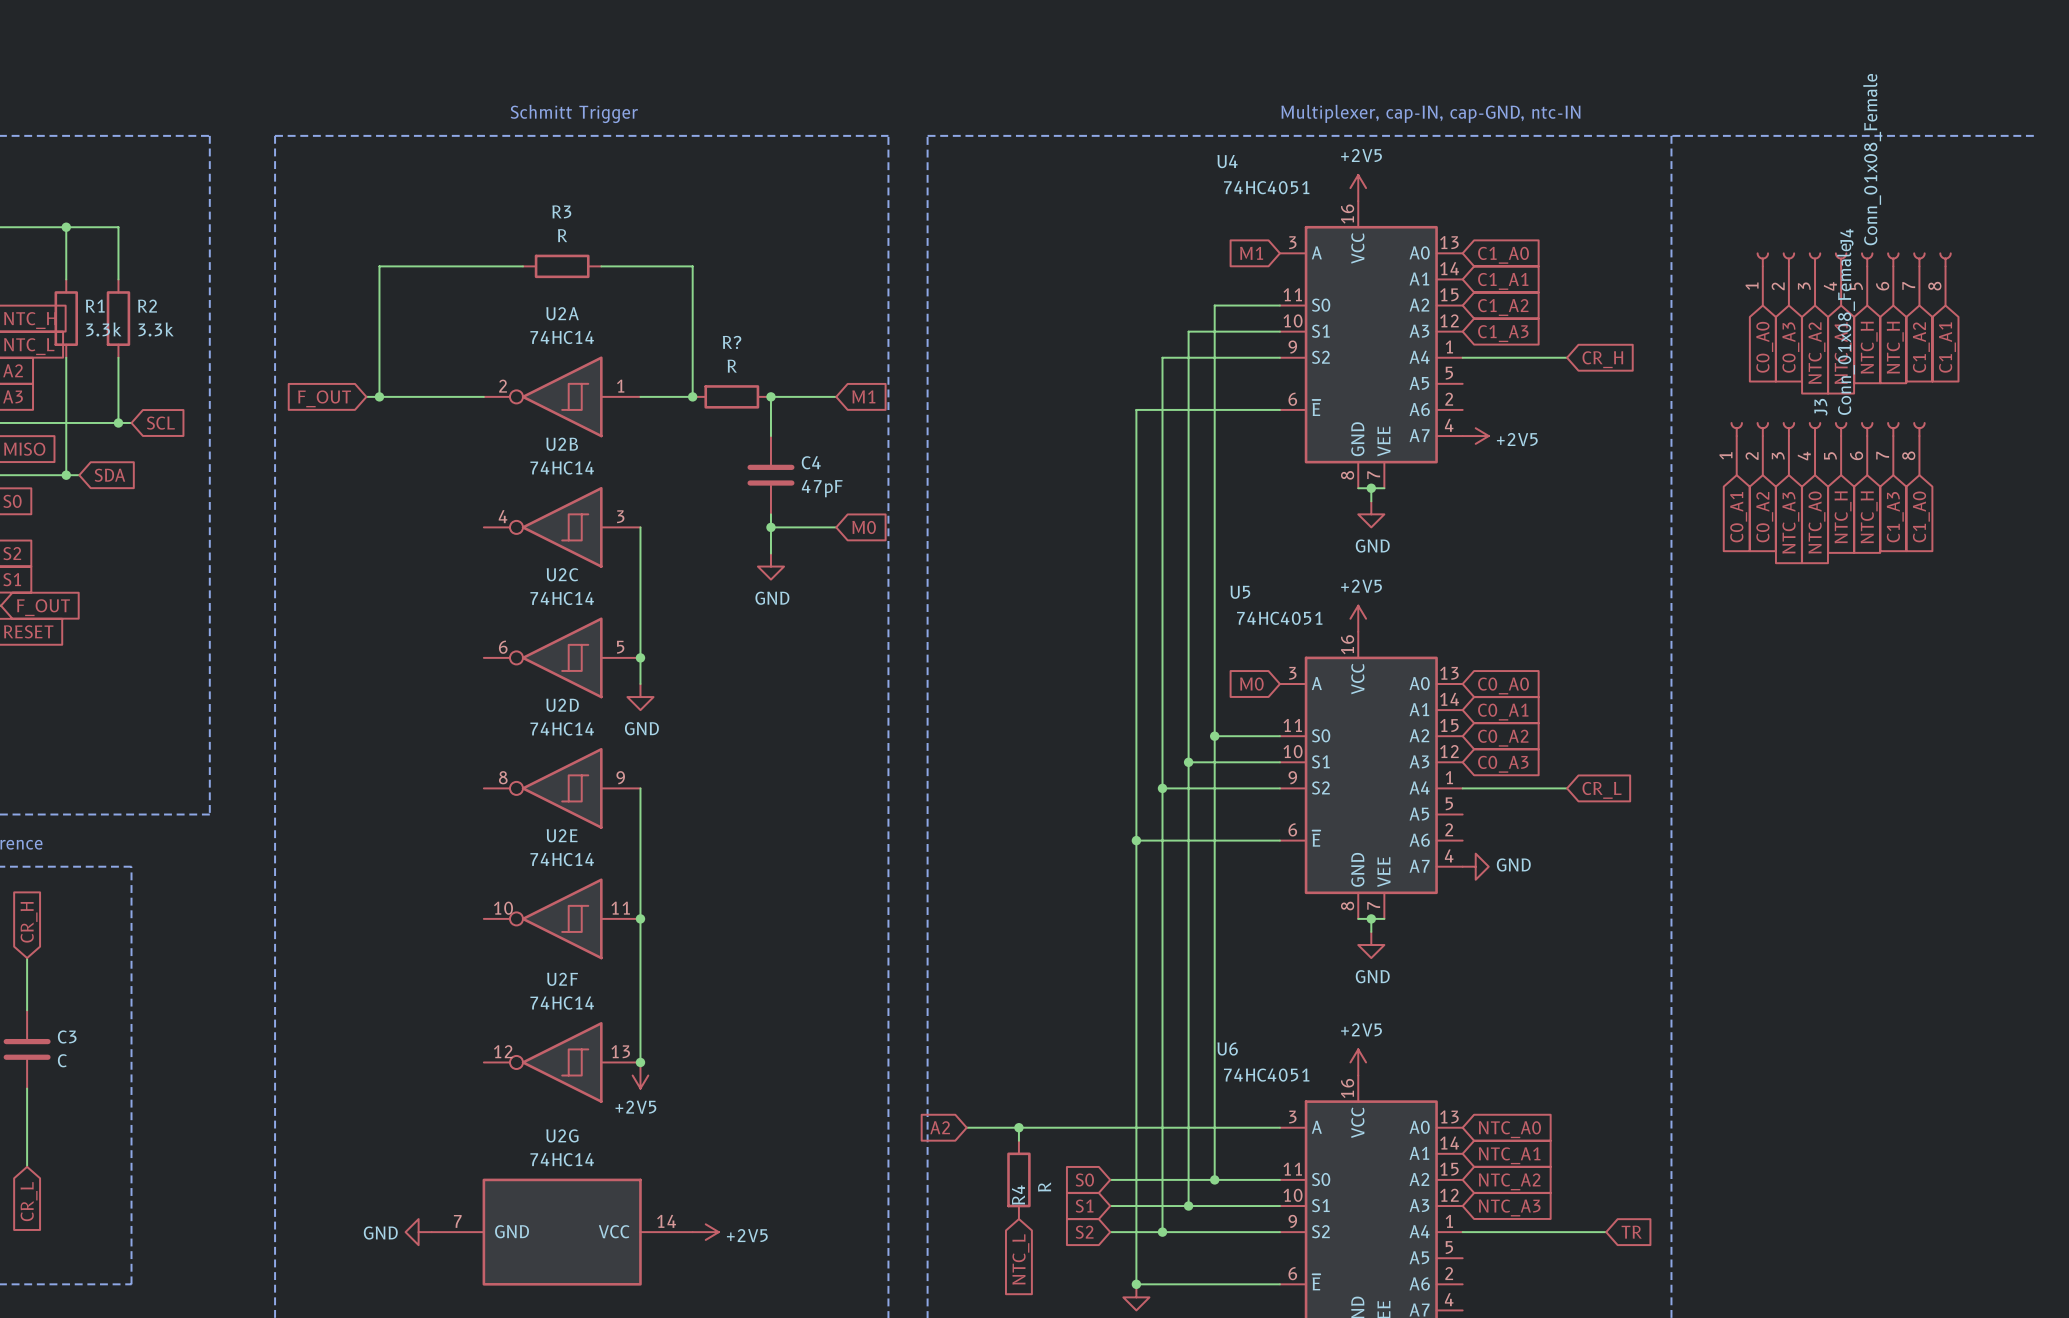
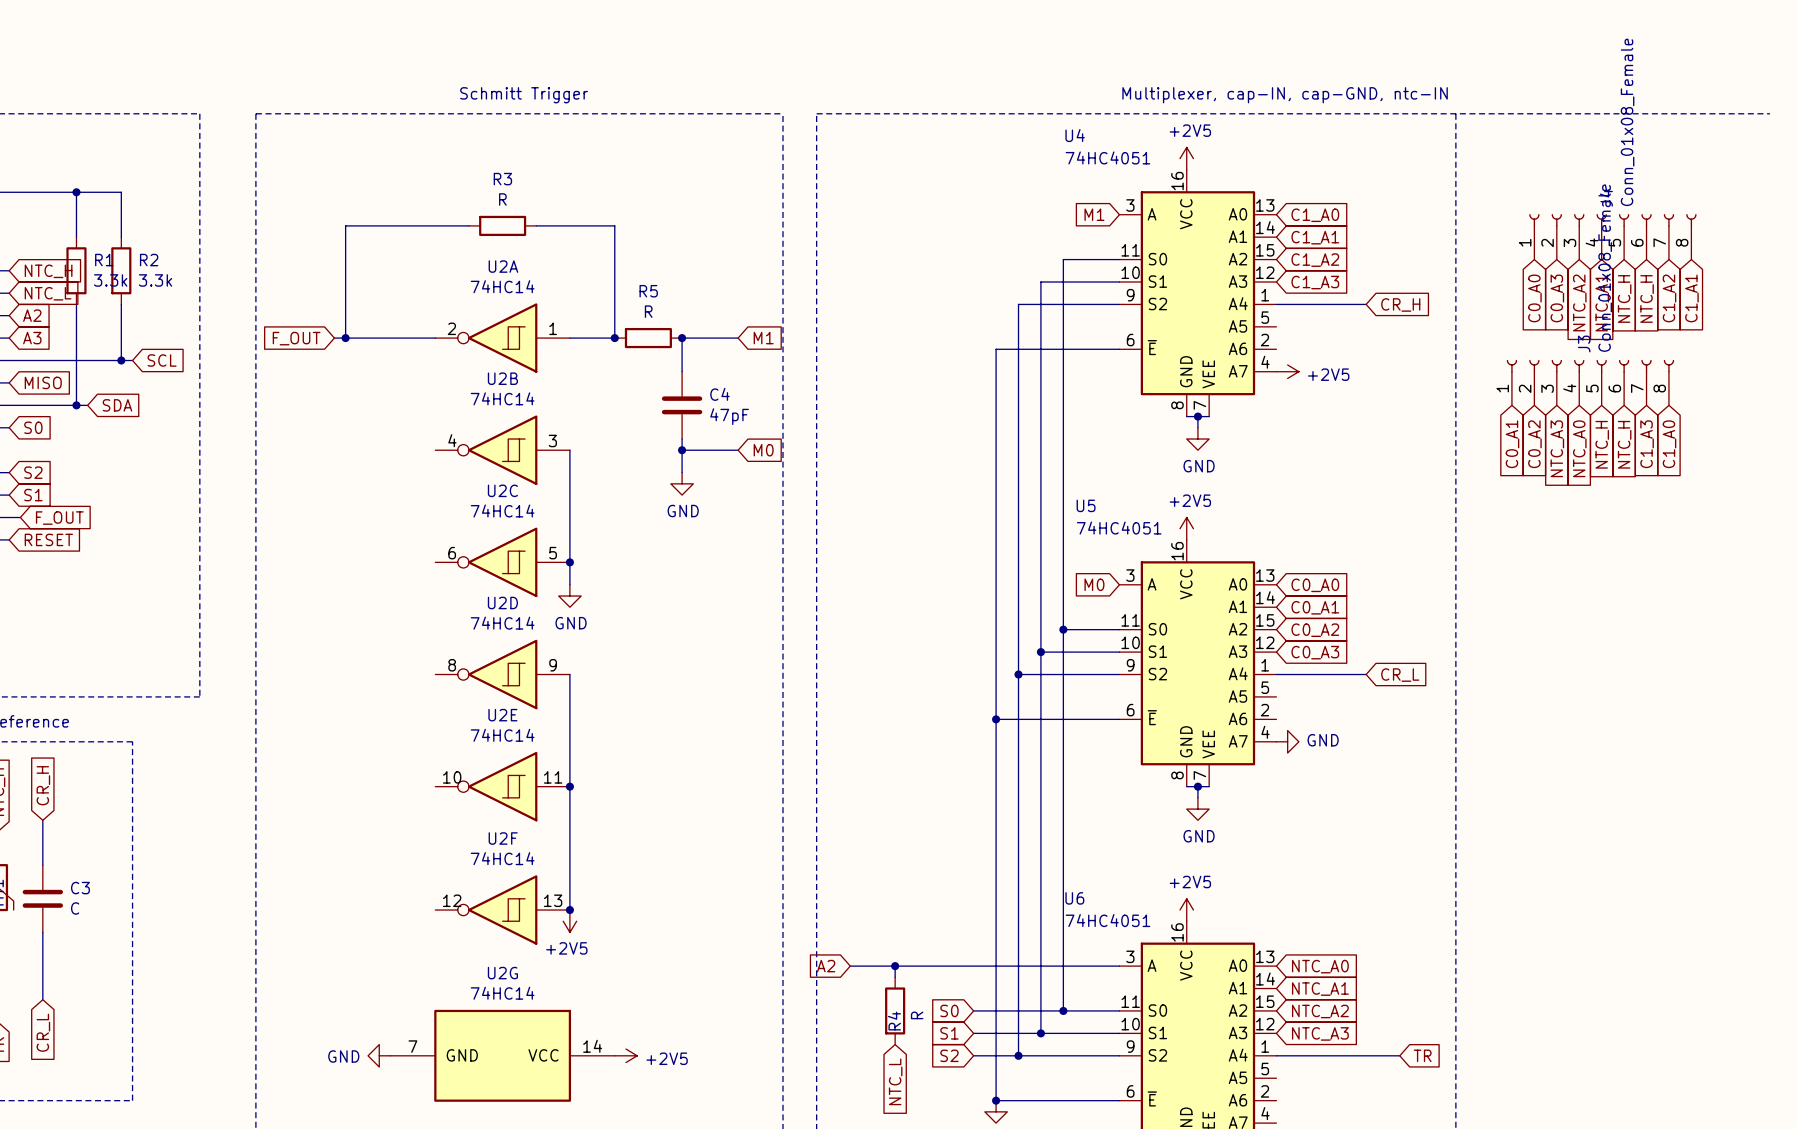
R? name: R? (732, 342) -> R5 (648, 291)

